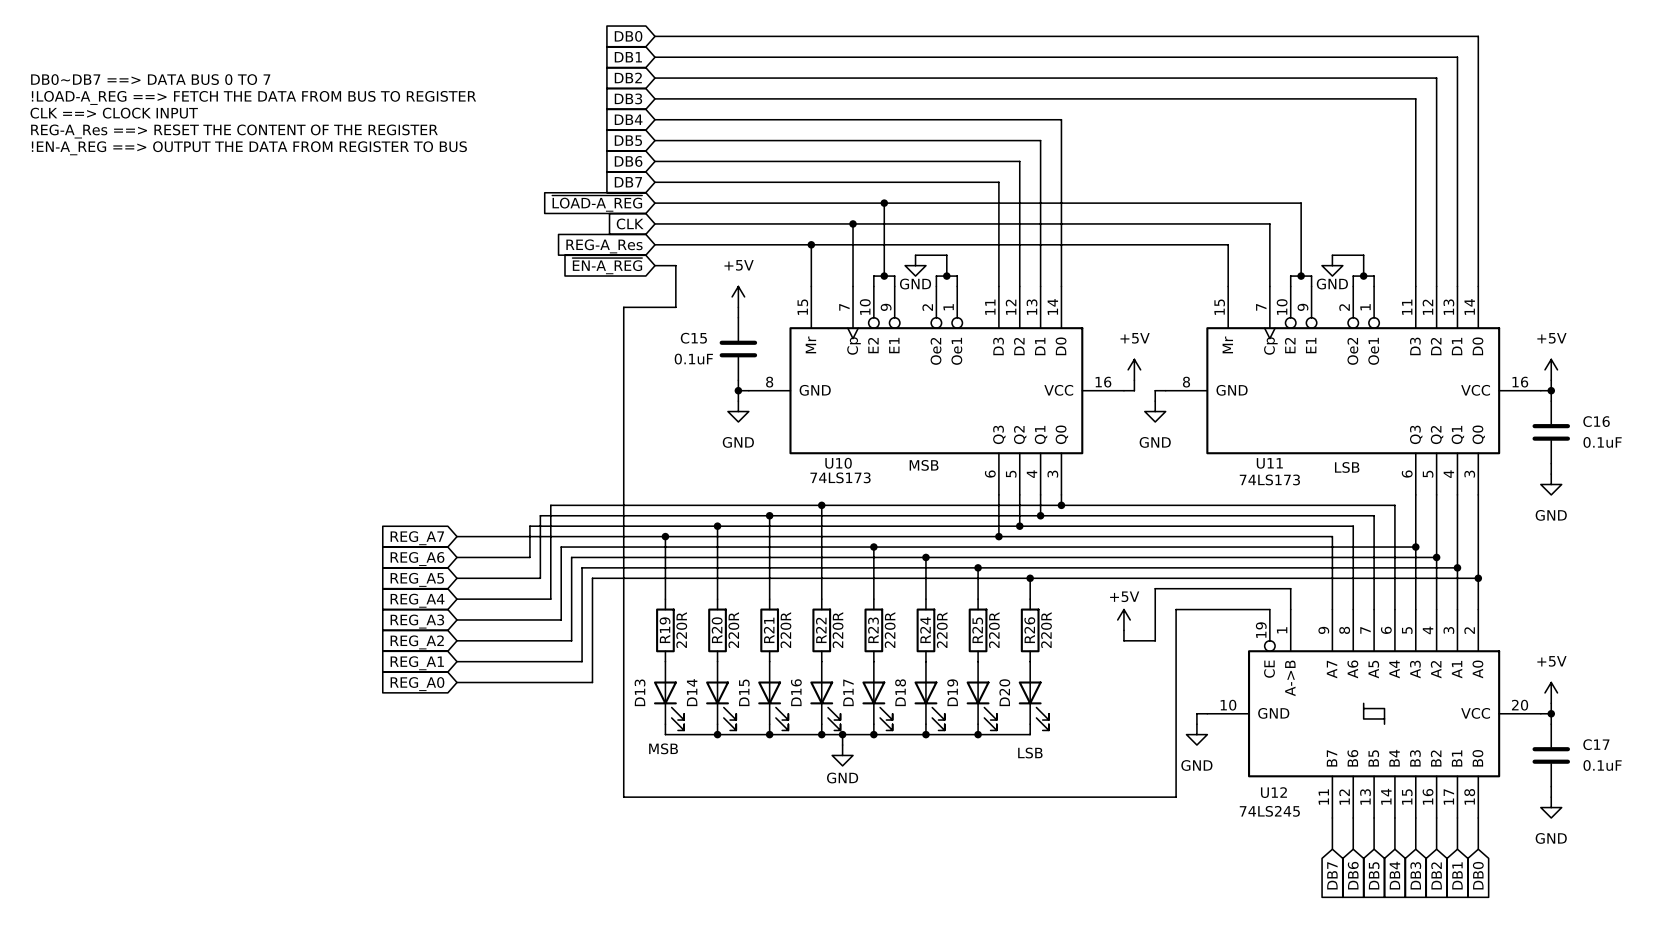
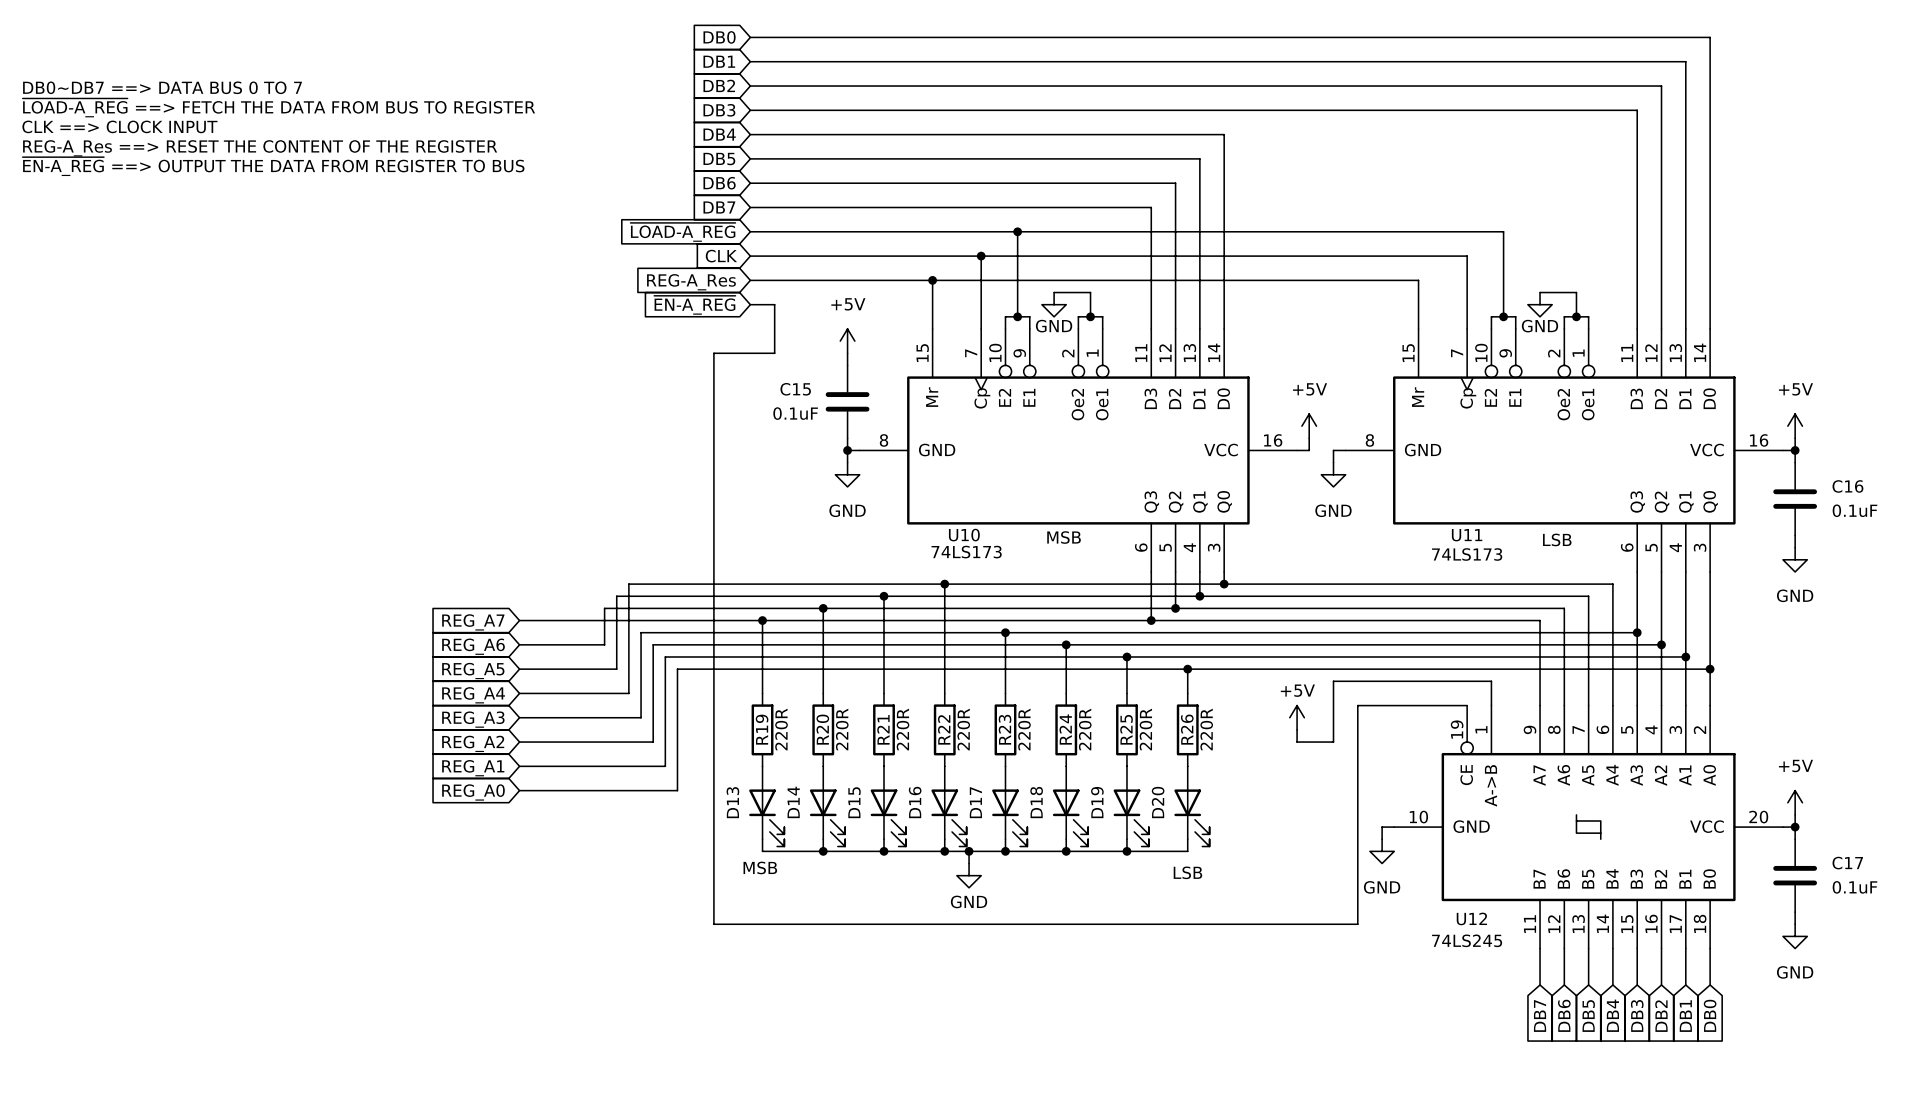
text: !LOAD-A_REG ==> FETCH THE DATA FROM BUS TO REGISTER (253, 97) -> ~{LOAD-A_REG} ==> FETCH THE DATA FROM BUS TO REGISTER (278, 107)
text: !EN-A_REG ==> OUTPUT THE DATA FROM REGISTER TO BUS (249, 148) -> ~{EN-A_REG} ==> OUTPUT THE DATA FROM REGISTER TO BUS (273, 166)

